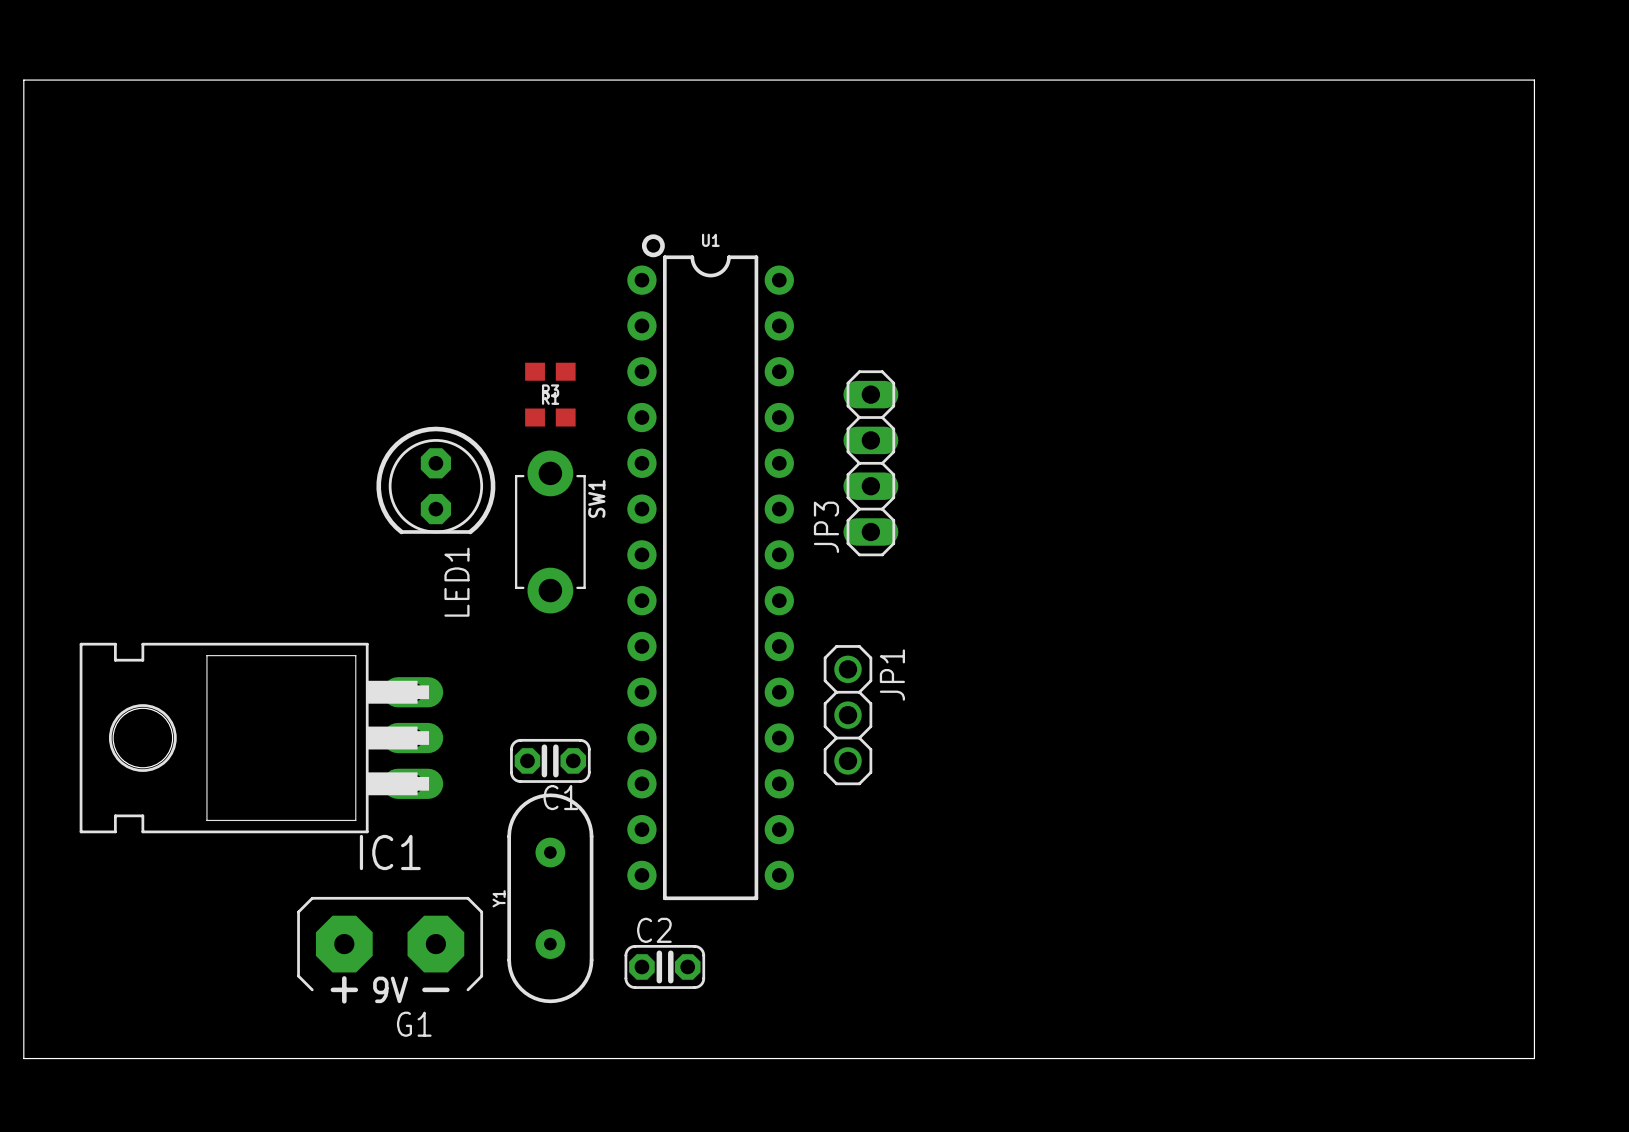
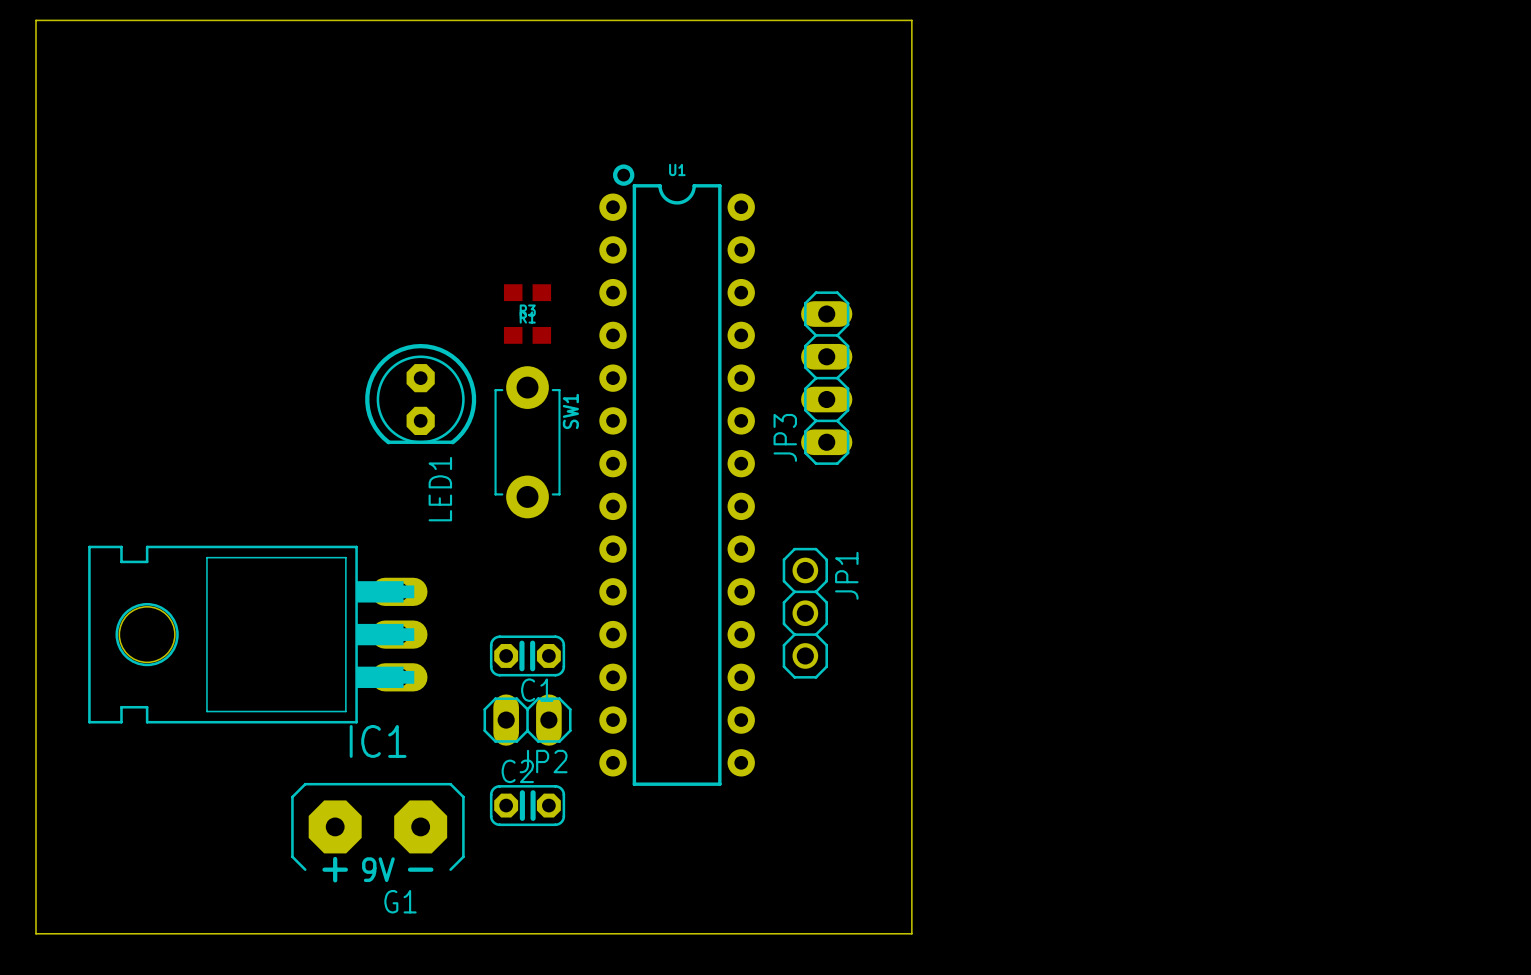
board edge: (962, 80) (1534, 80) (1534, 1058) (962, 1058) -> (911, 20) (911, 933)
JP2: none -> (527, 720)
Y1: (550, 898) -> none
C2 position: (664, 966) -> (527, 805)

